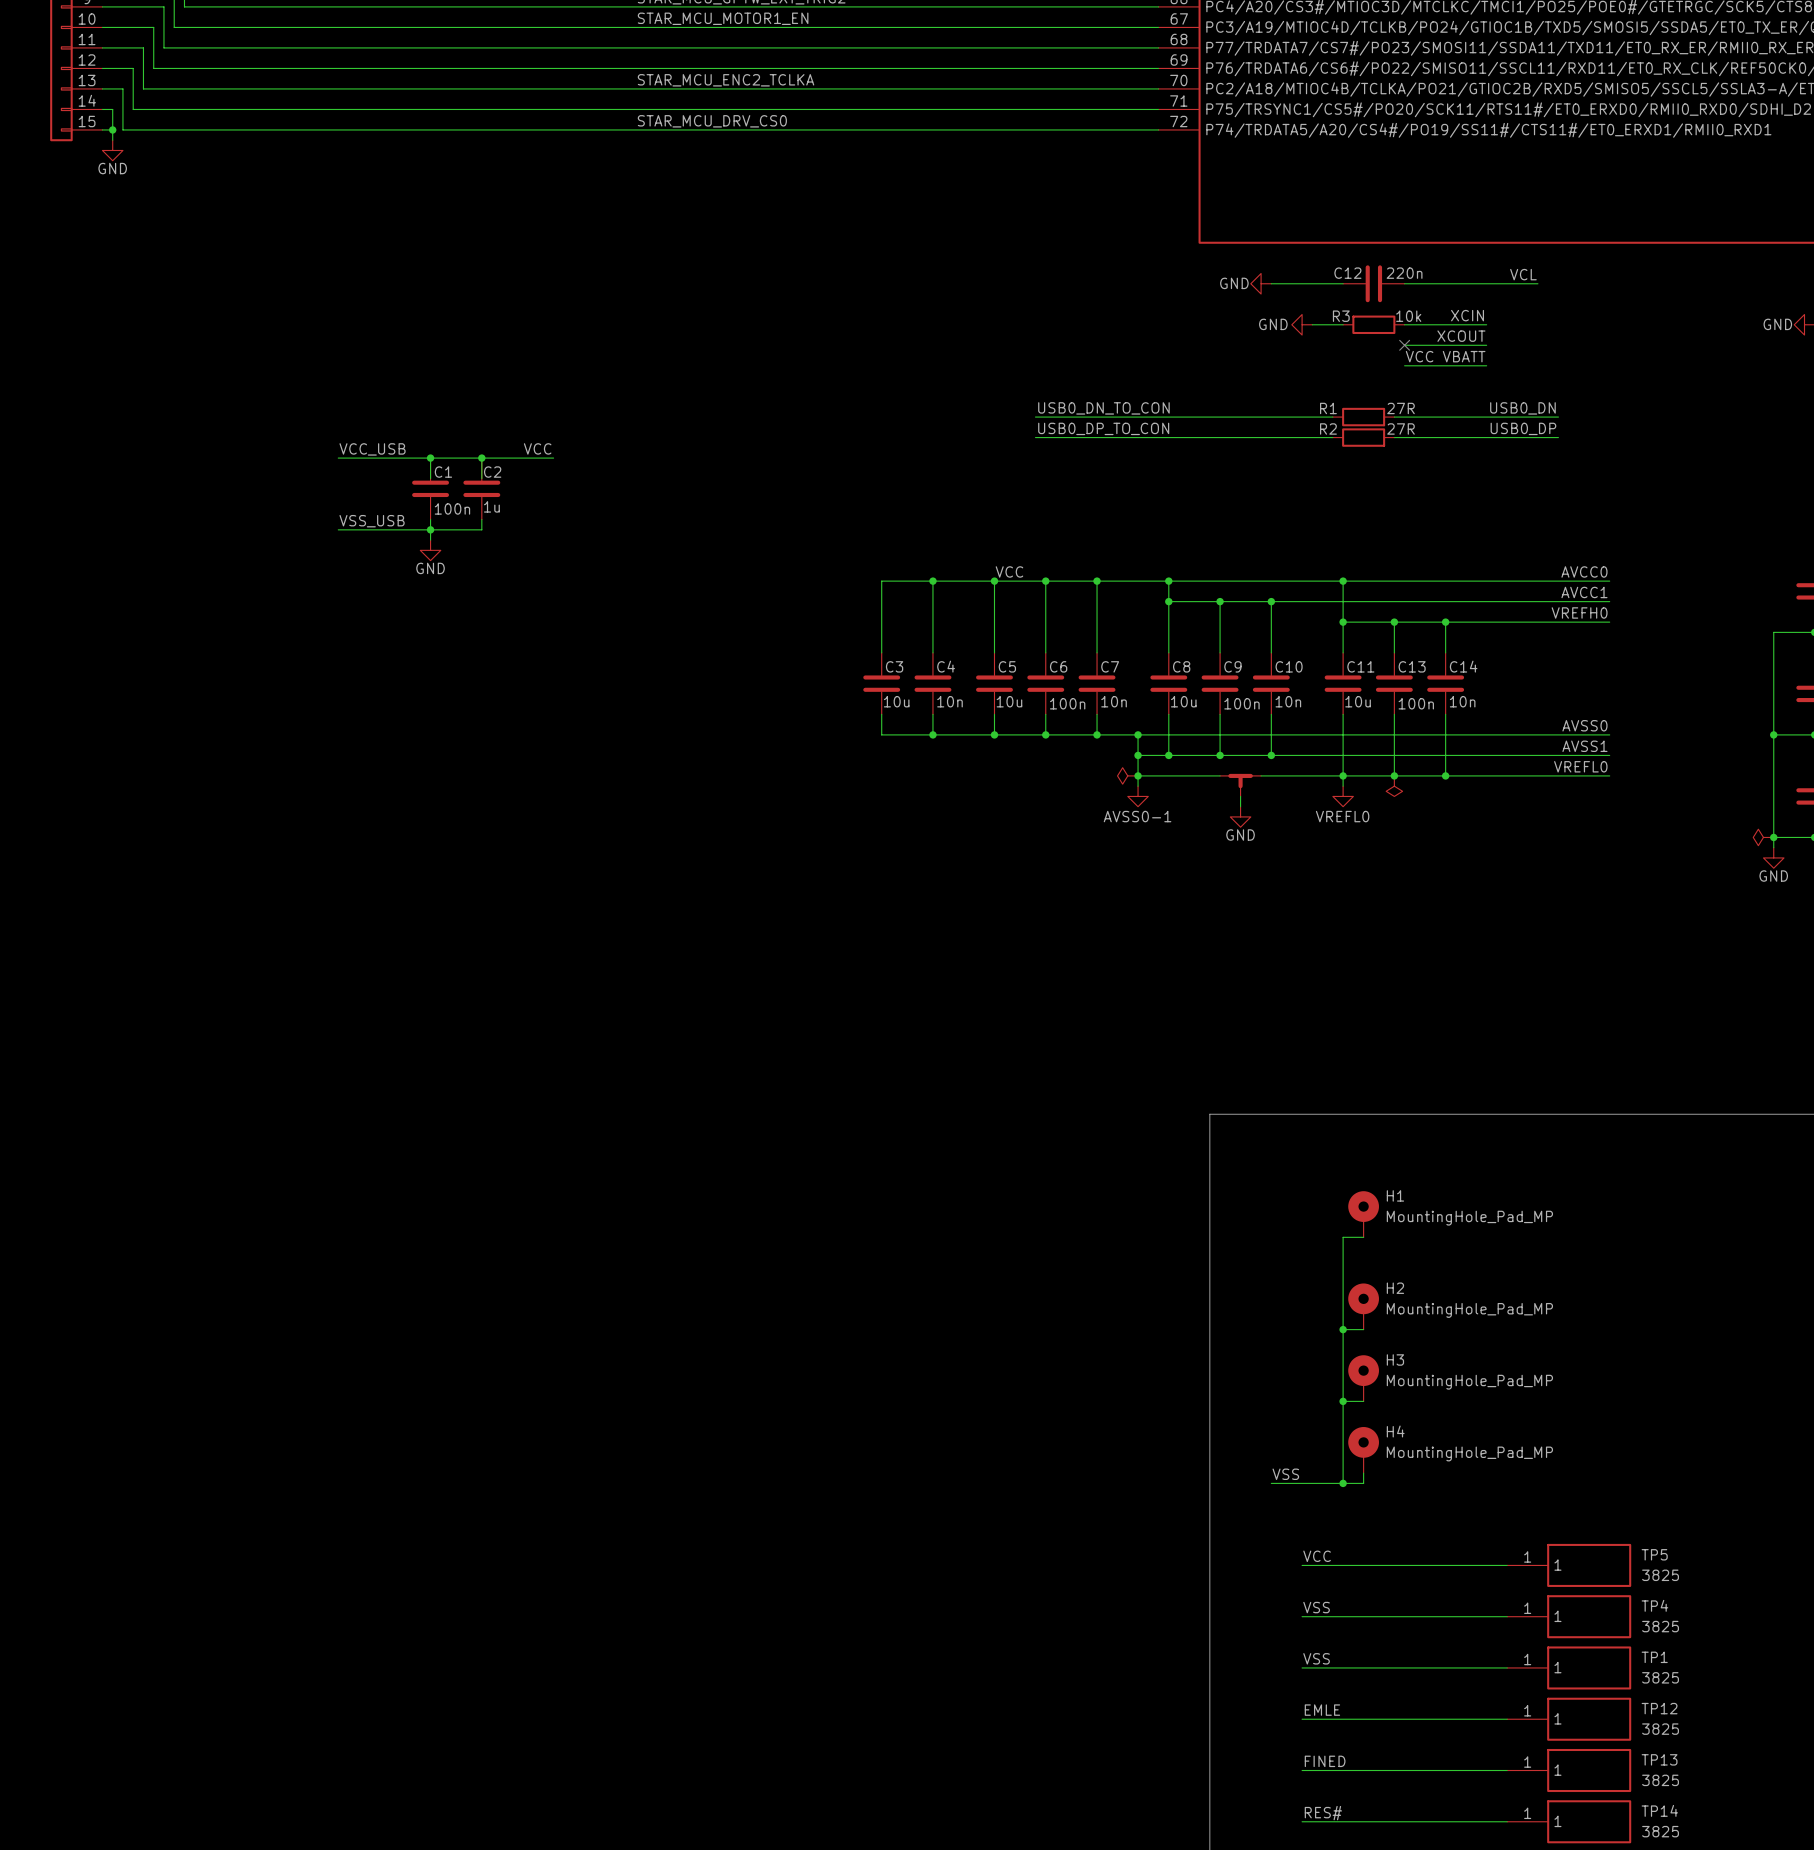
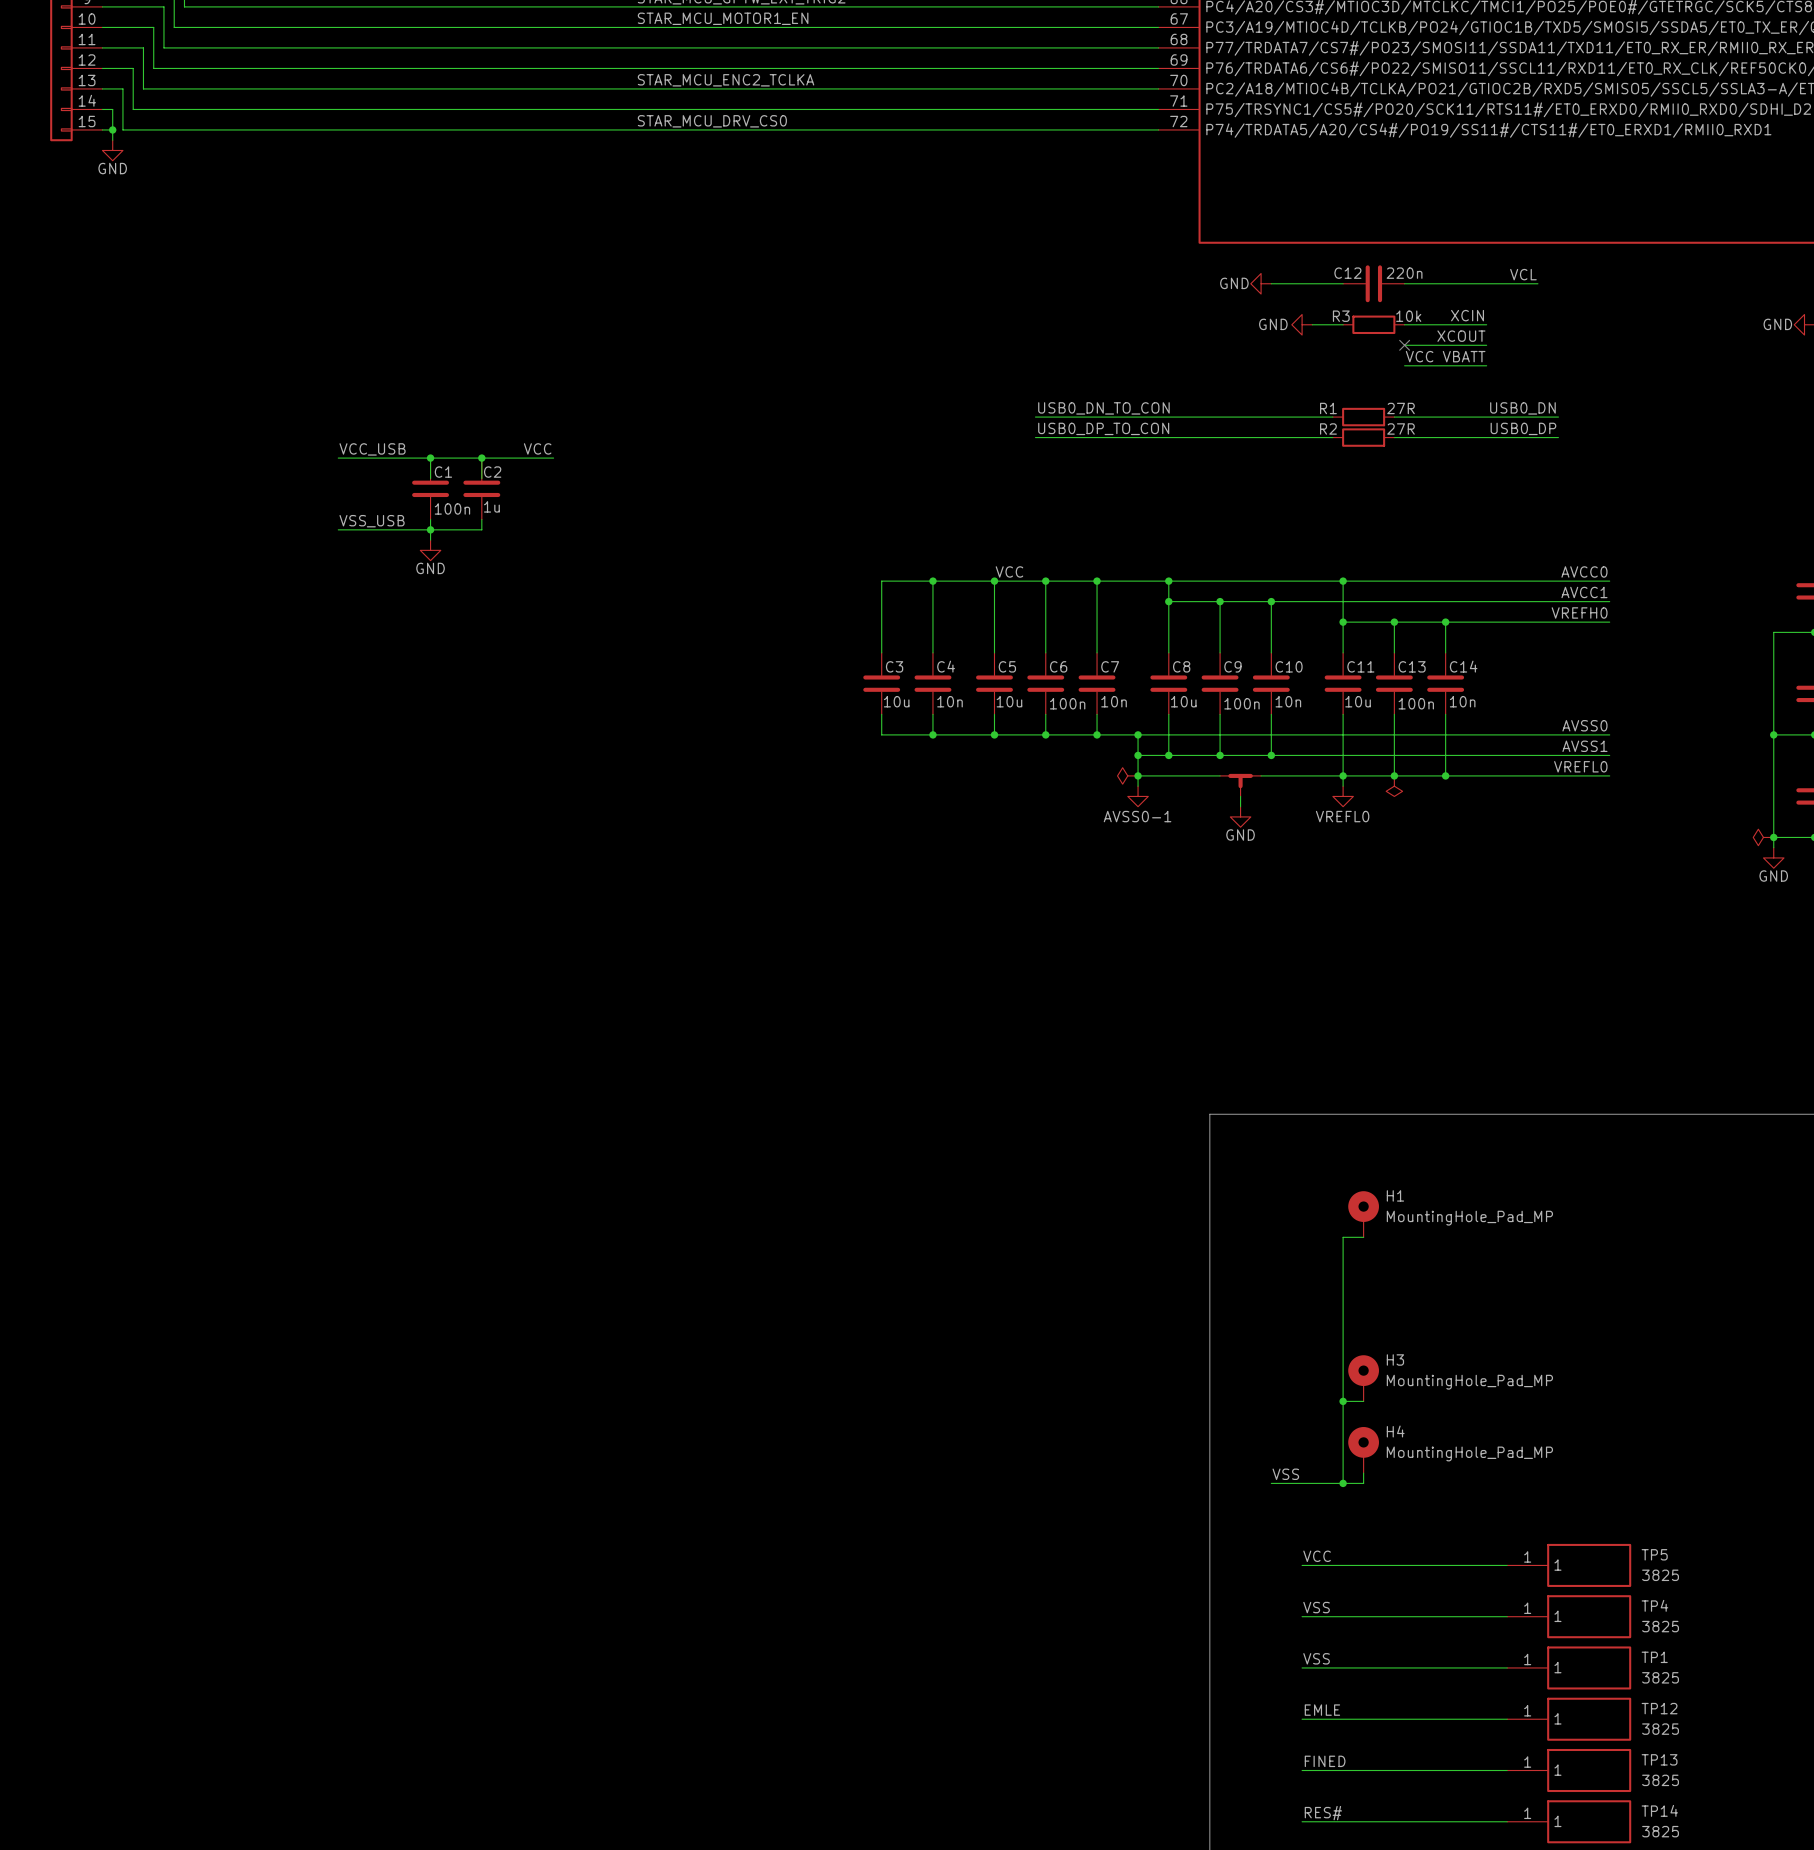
H2: MountingHole_Pad_MP (1363, 1306) -> none
wire: (1343, 1329) (1363, 1329) -> none
junction: (1343, 1329) -> none

